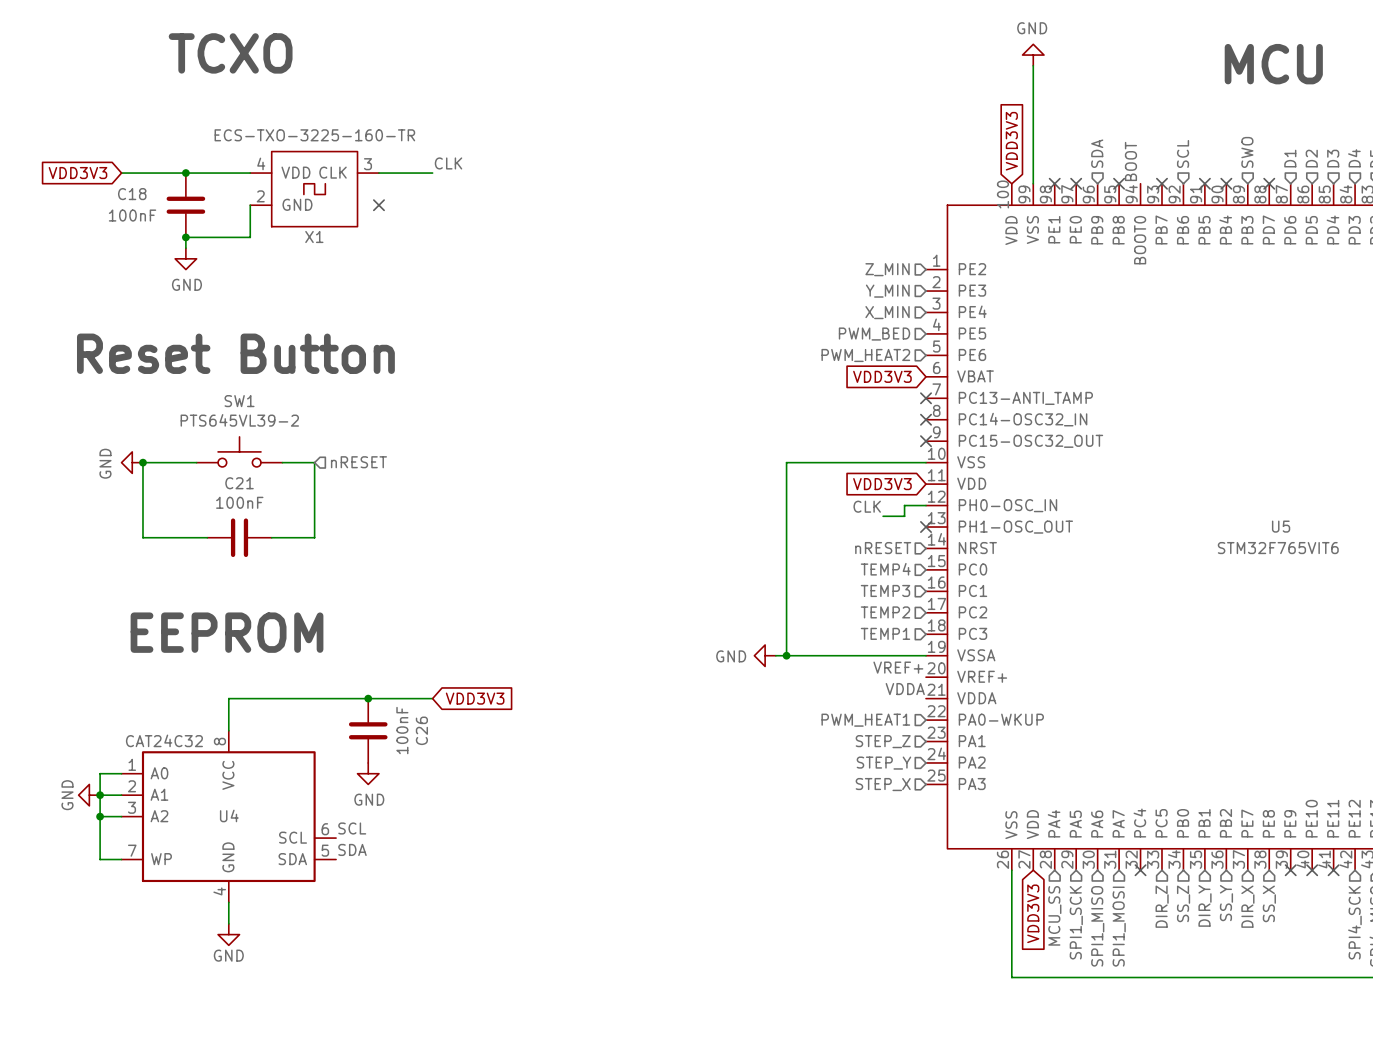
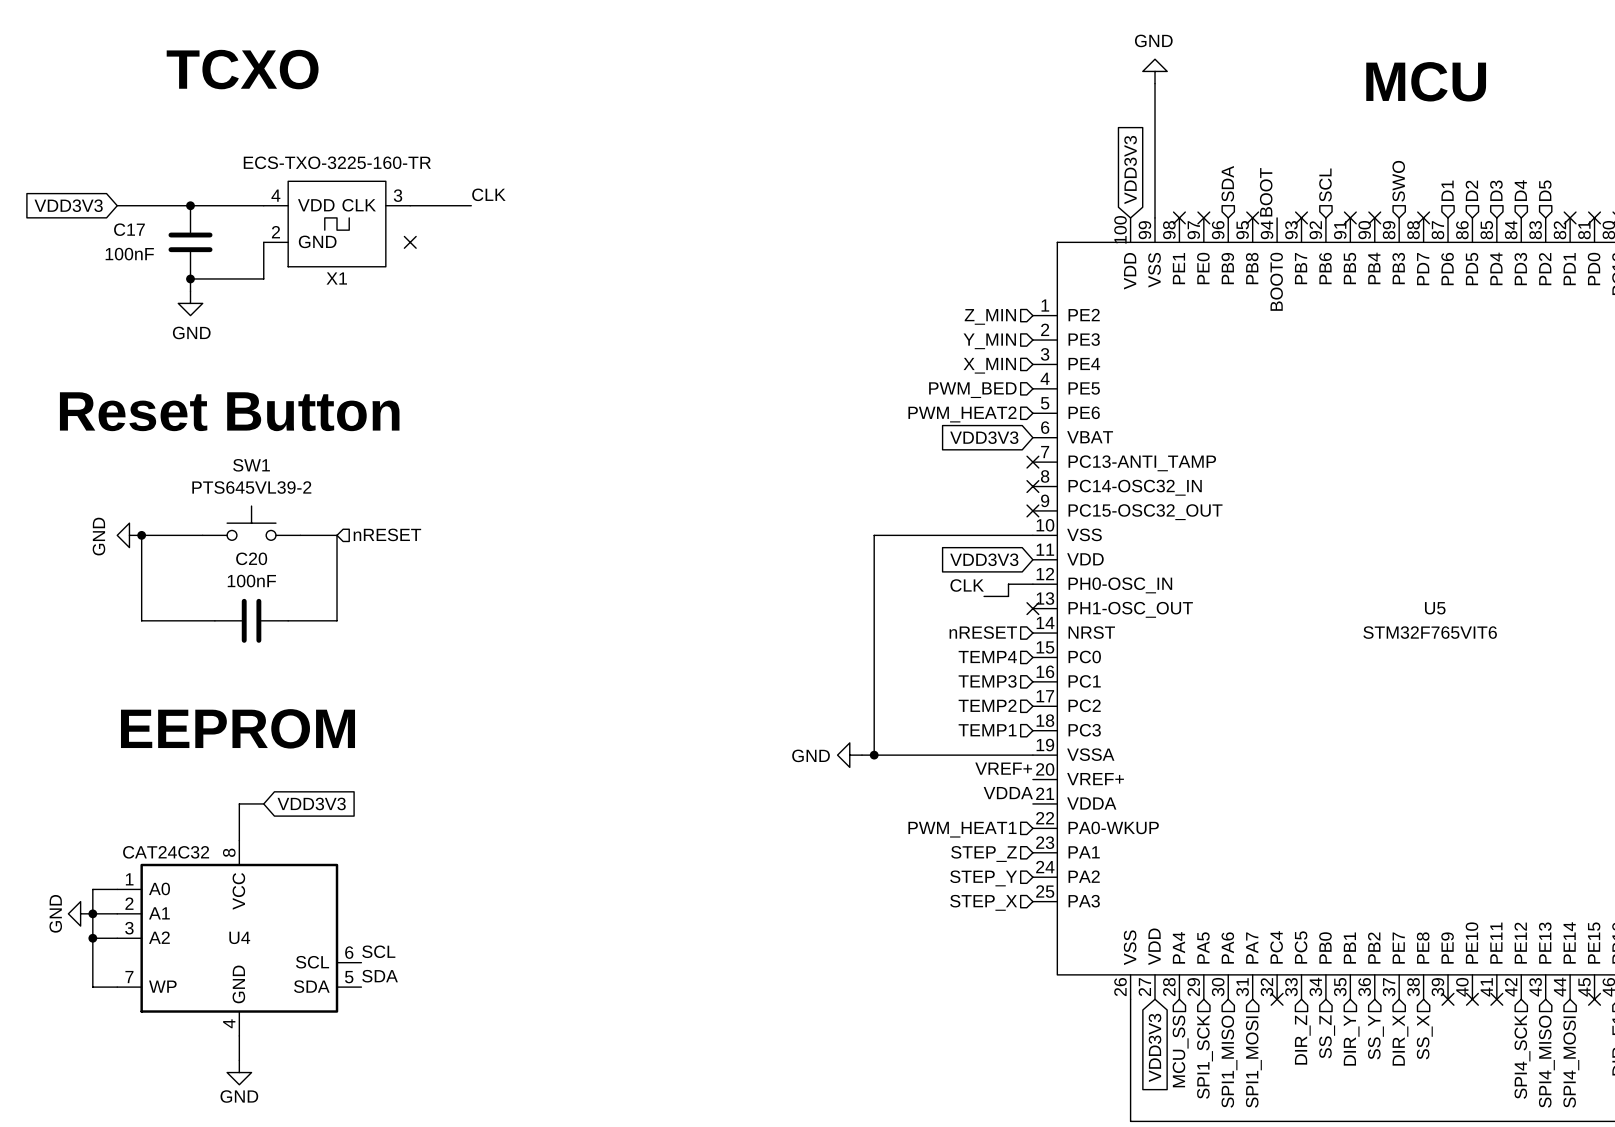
C18 name: C18 (132, 194) -> C17 (129, 229)
C21 name: C21 (239, 483) -> C20 (251, 558)
wire: (250, 698) (432, 698) -> none
junction: (368, 698) -> none
global label position: VDD3V3 (475, 698) -> VDD3V3 (311, 803)
C26: 100nF (368, 730) -> none
power symbol: GND (368, 773) -> none

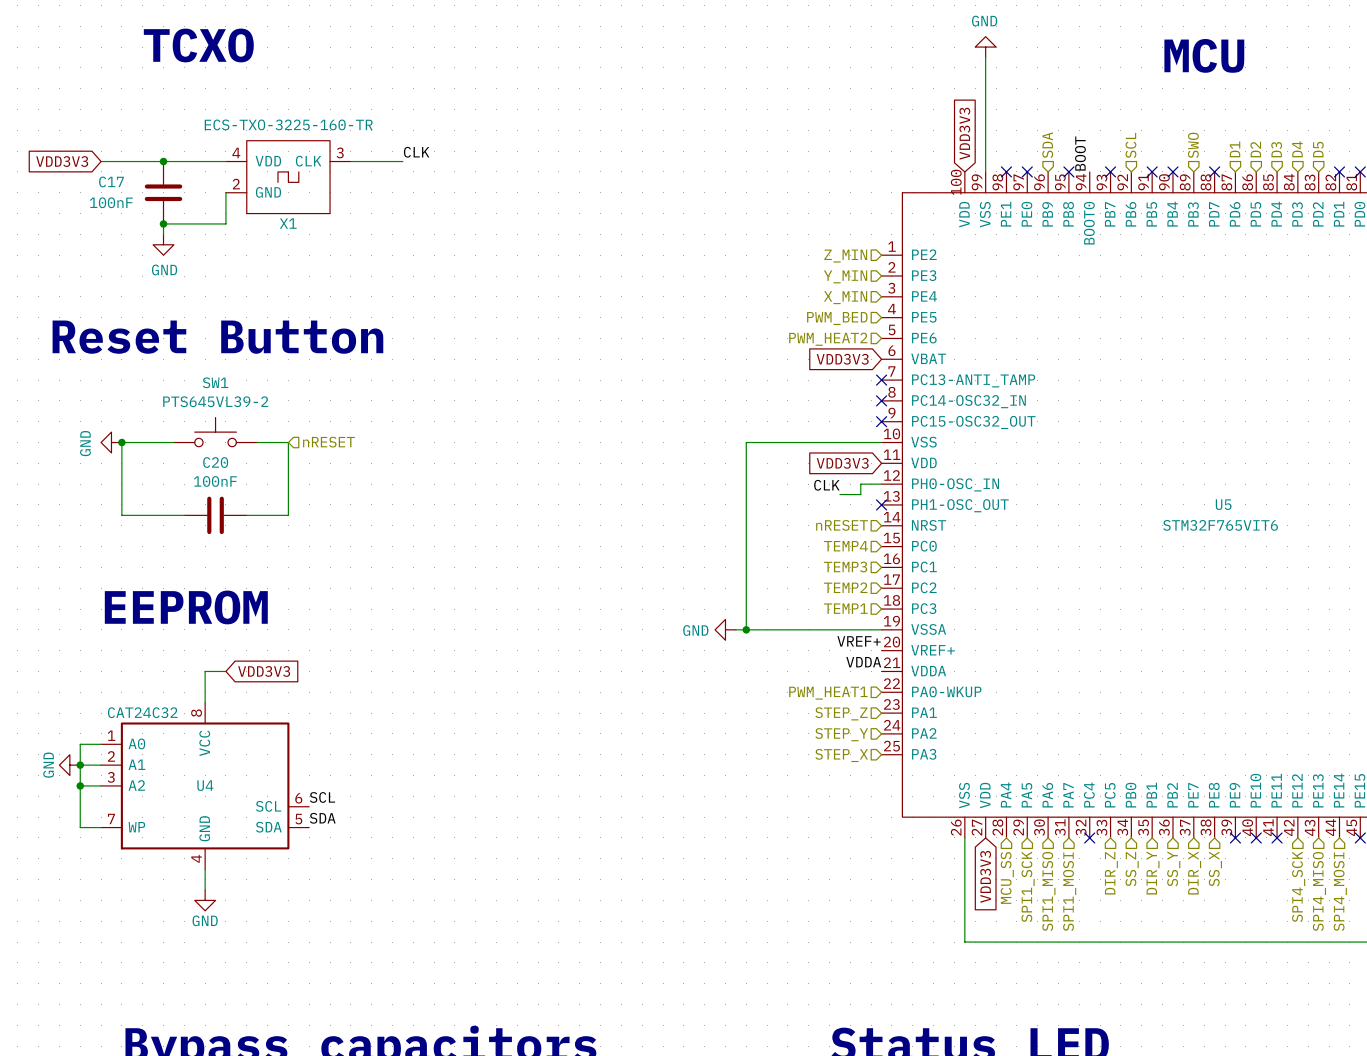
no-connect mark: (410, 242) -> none

